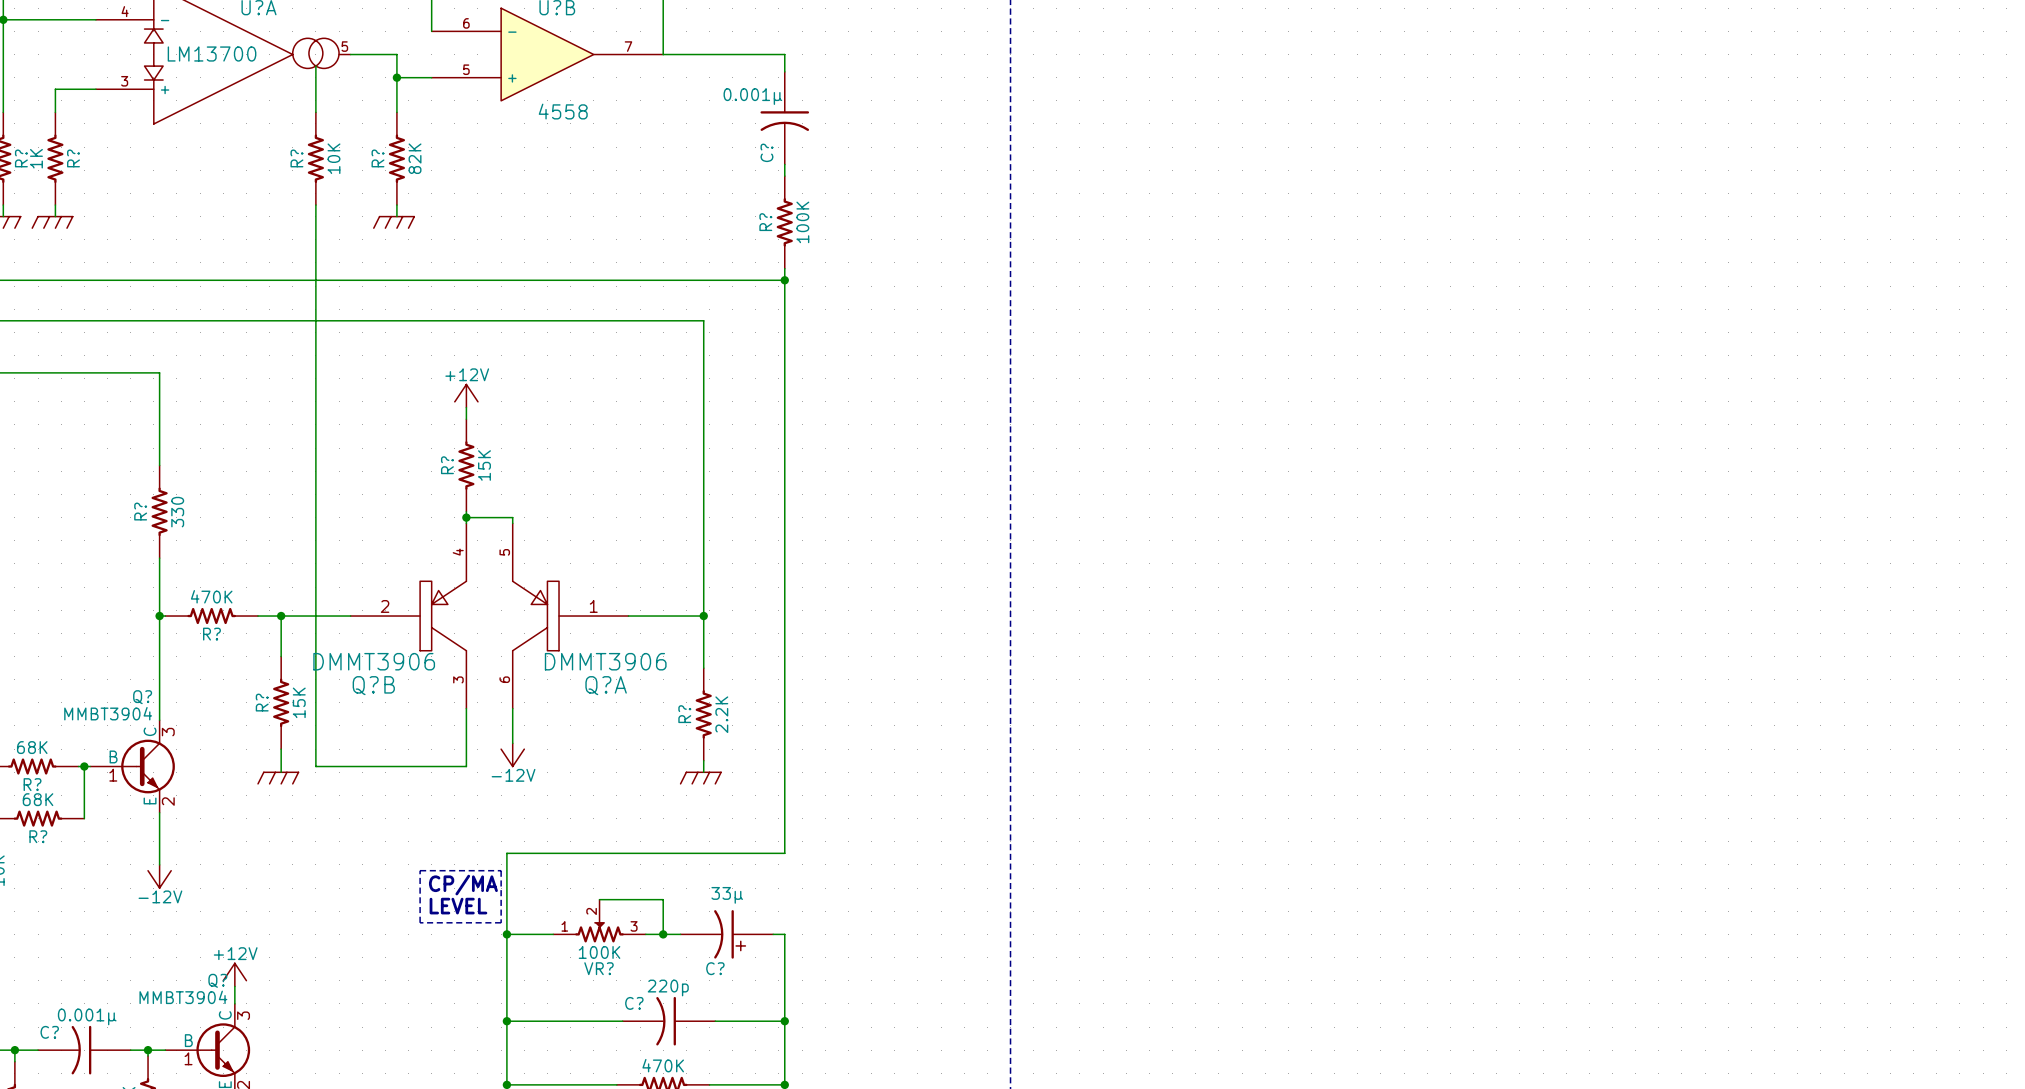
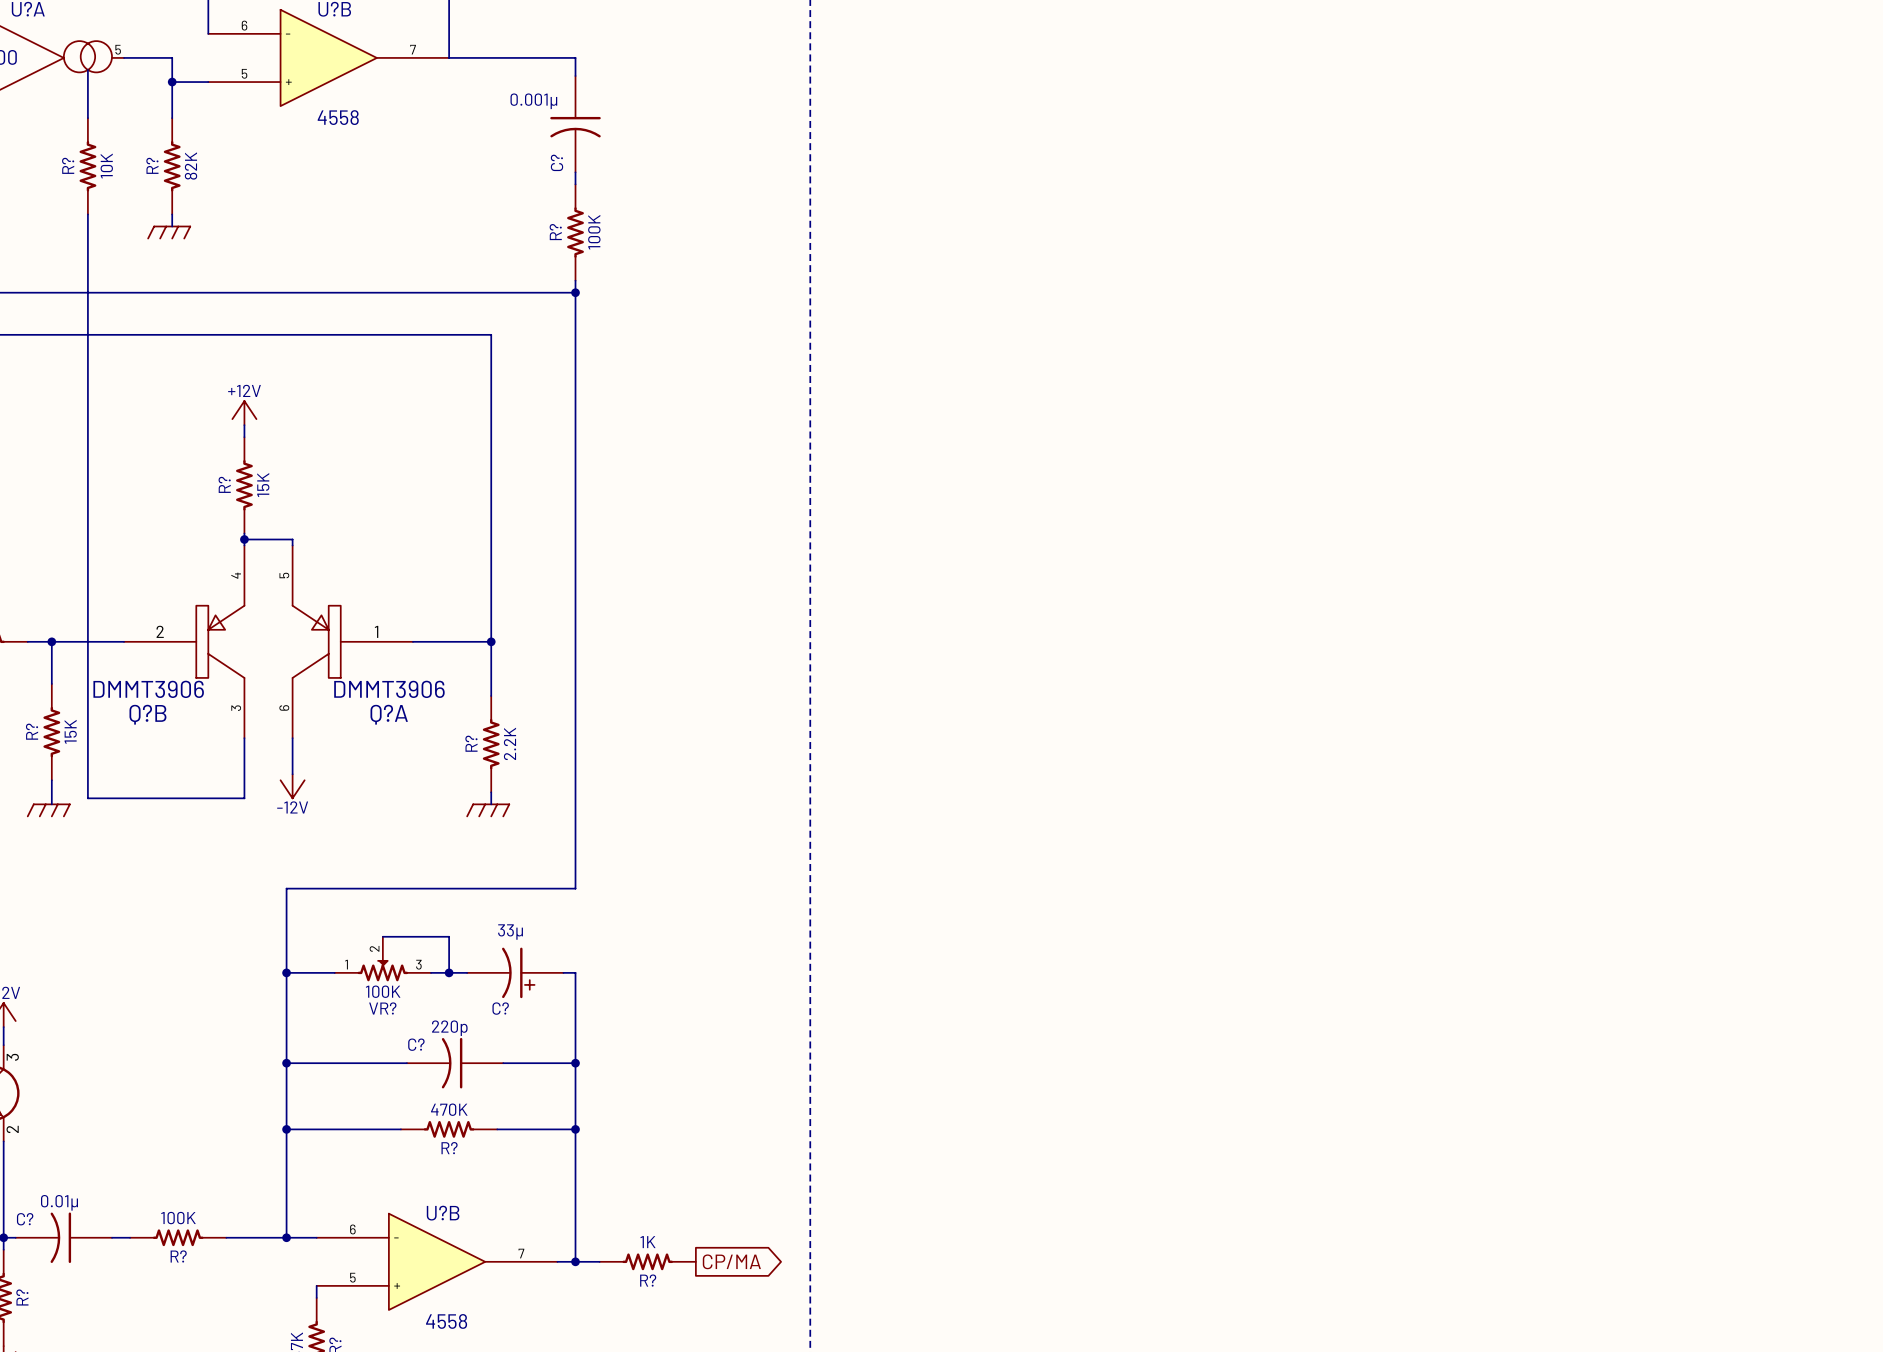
line: (420, 870) (501, 870) (501, 922) (420, 922) (420, 870) -> none
text: CP/MA (463, 885) -> none
text: LEVEL (458, 906) -> none

